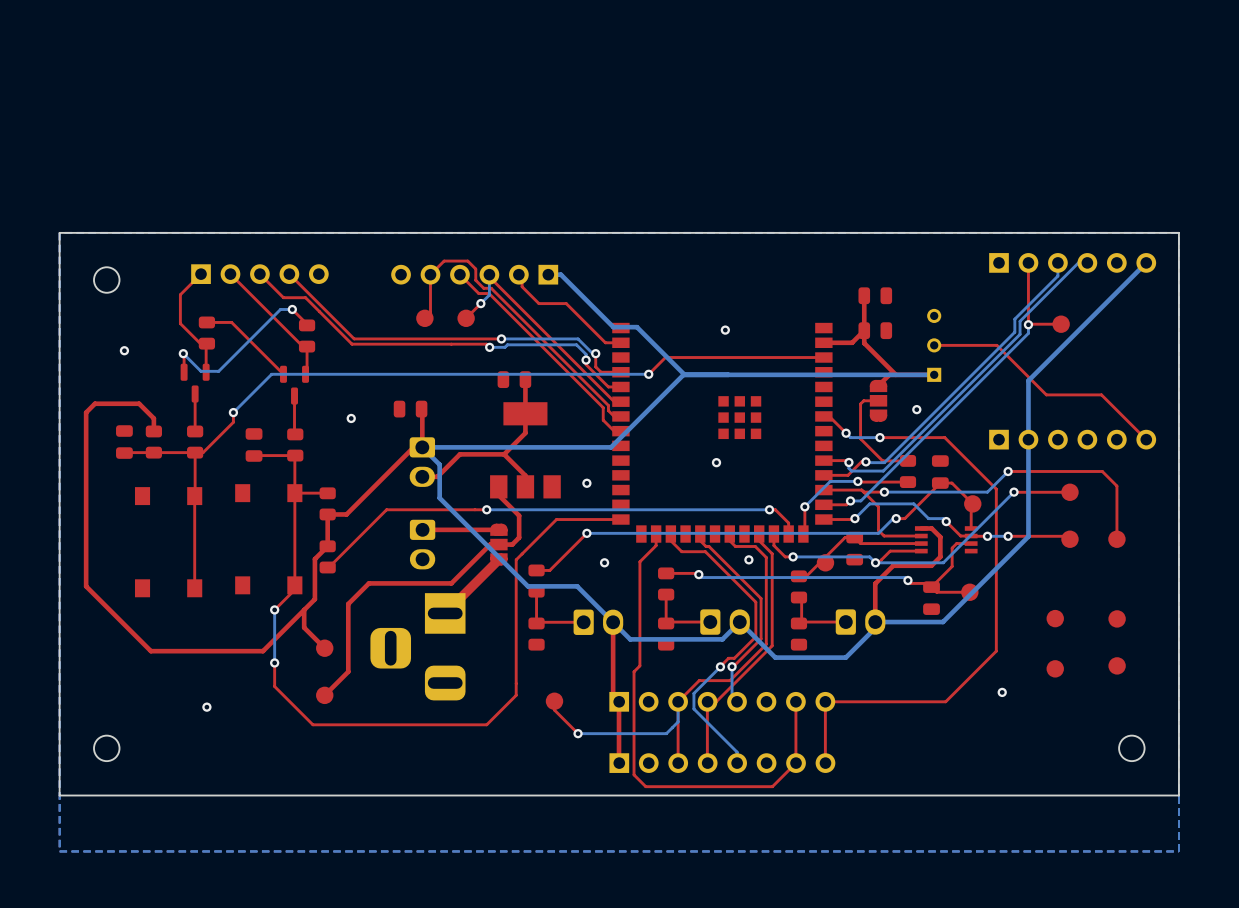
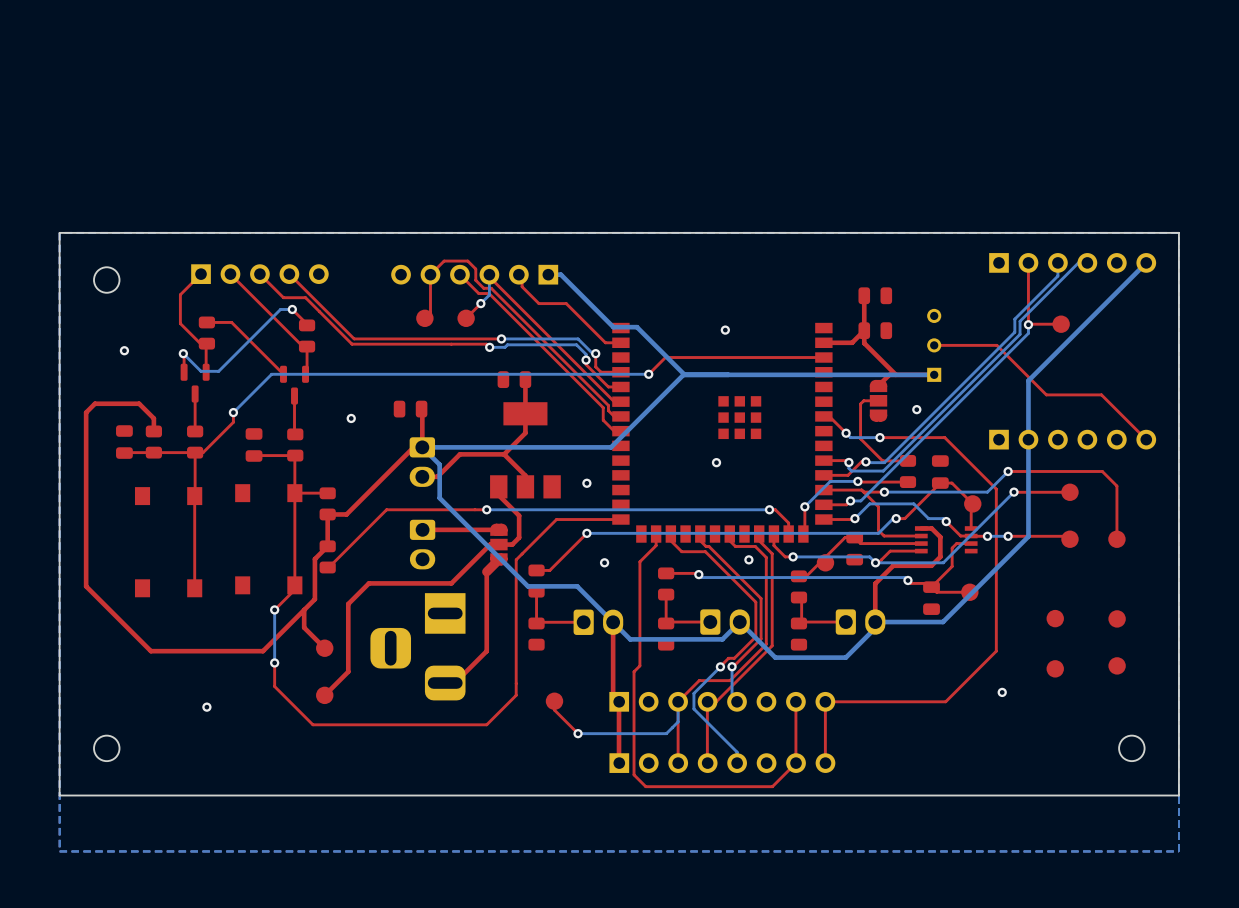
top track: (486, 571) (445, 613) -> (486, 571) (486, 651) (454, 683)

